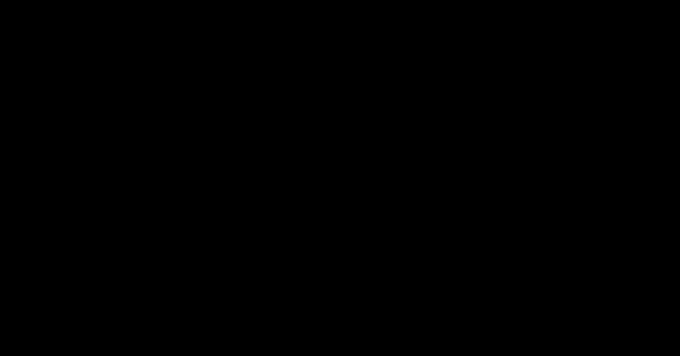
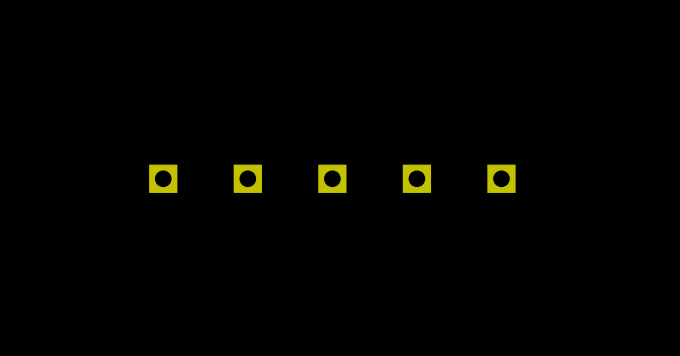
part: none -> (163, 178)
part: none -> (247, 178)
part: none -> (332, 178)
part: none -> (416, 178)
part: none -> (501, 178)

